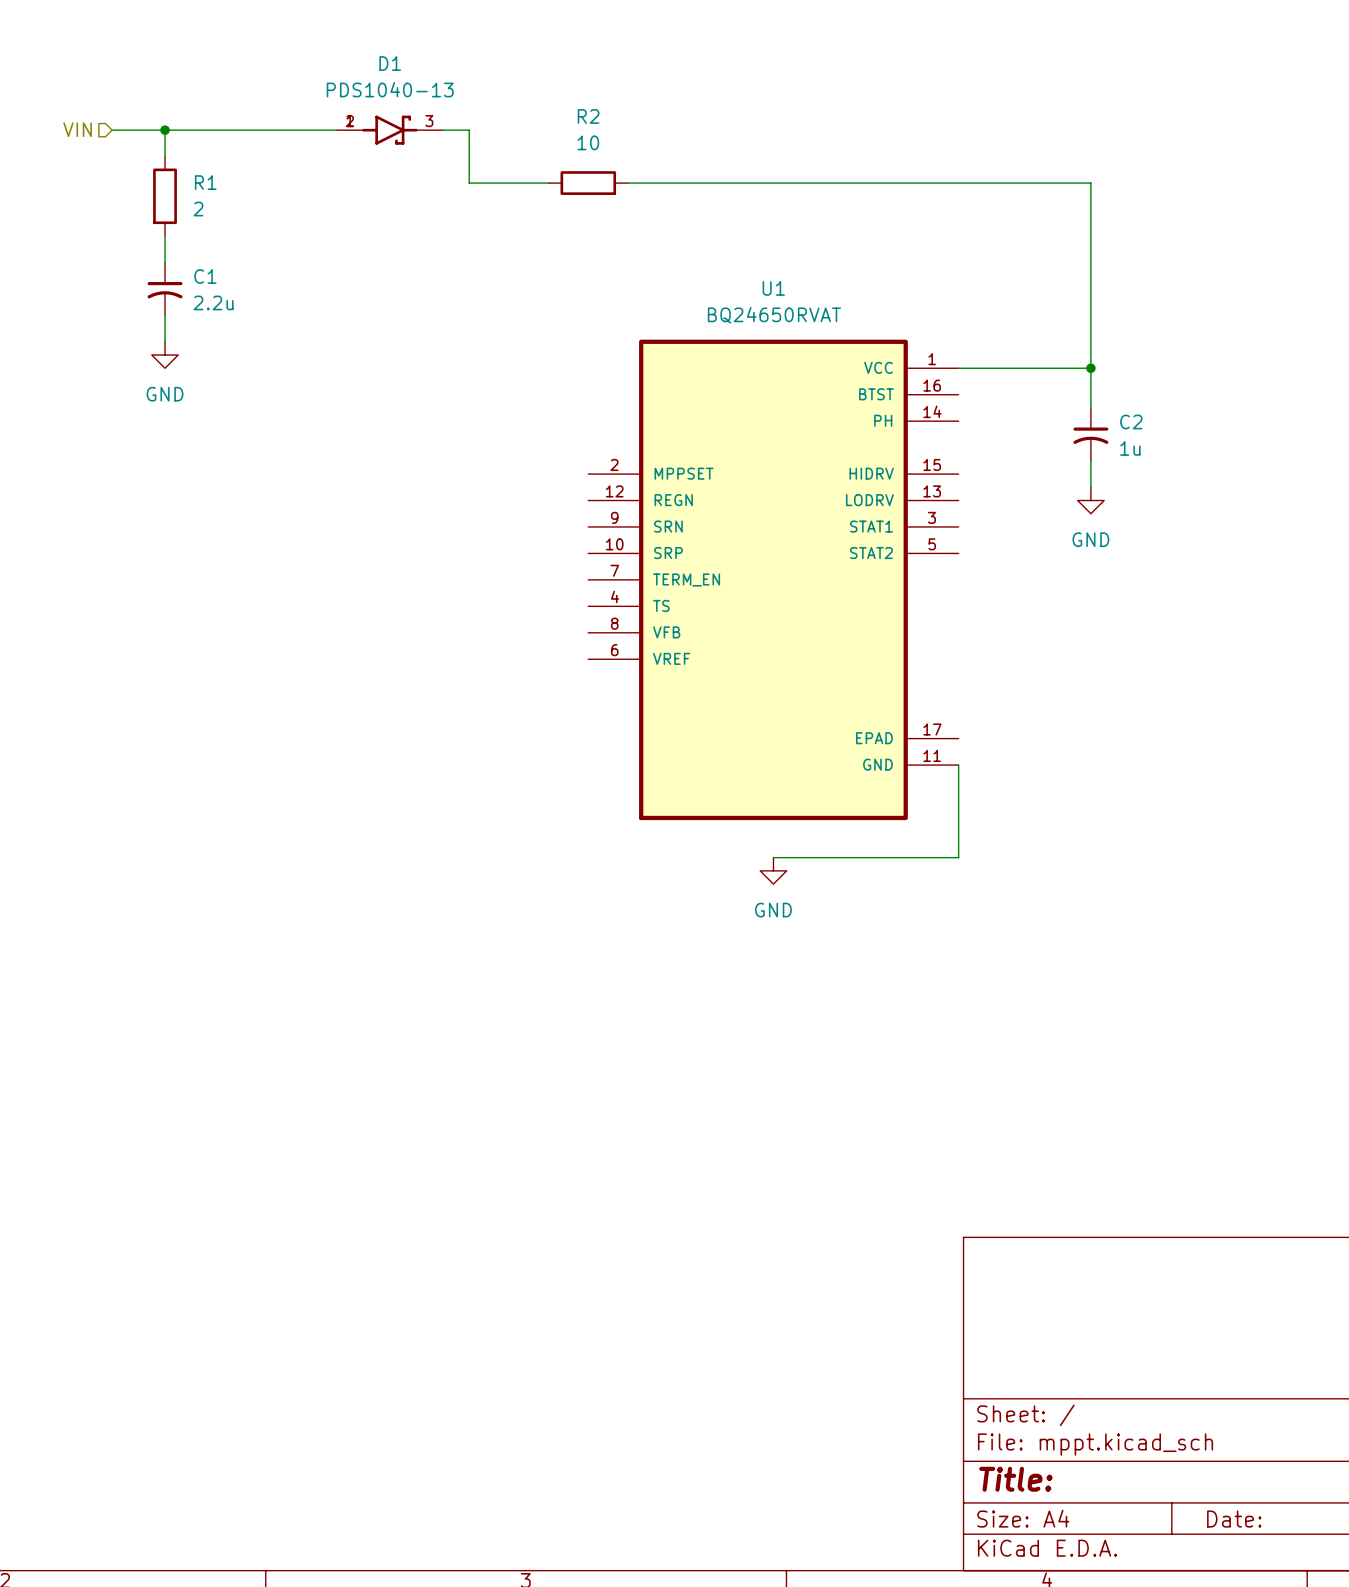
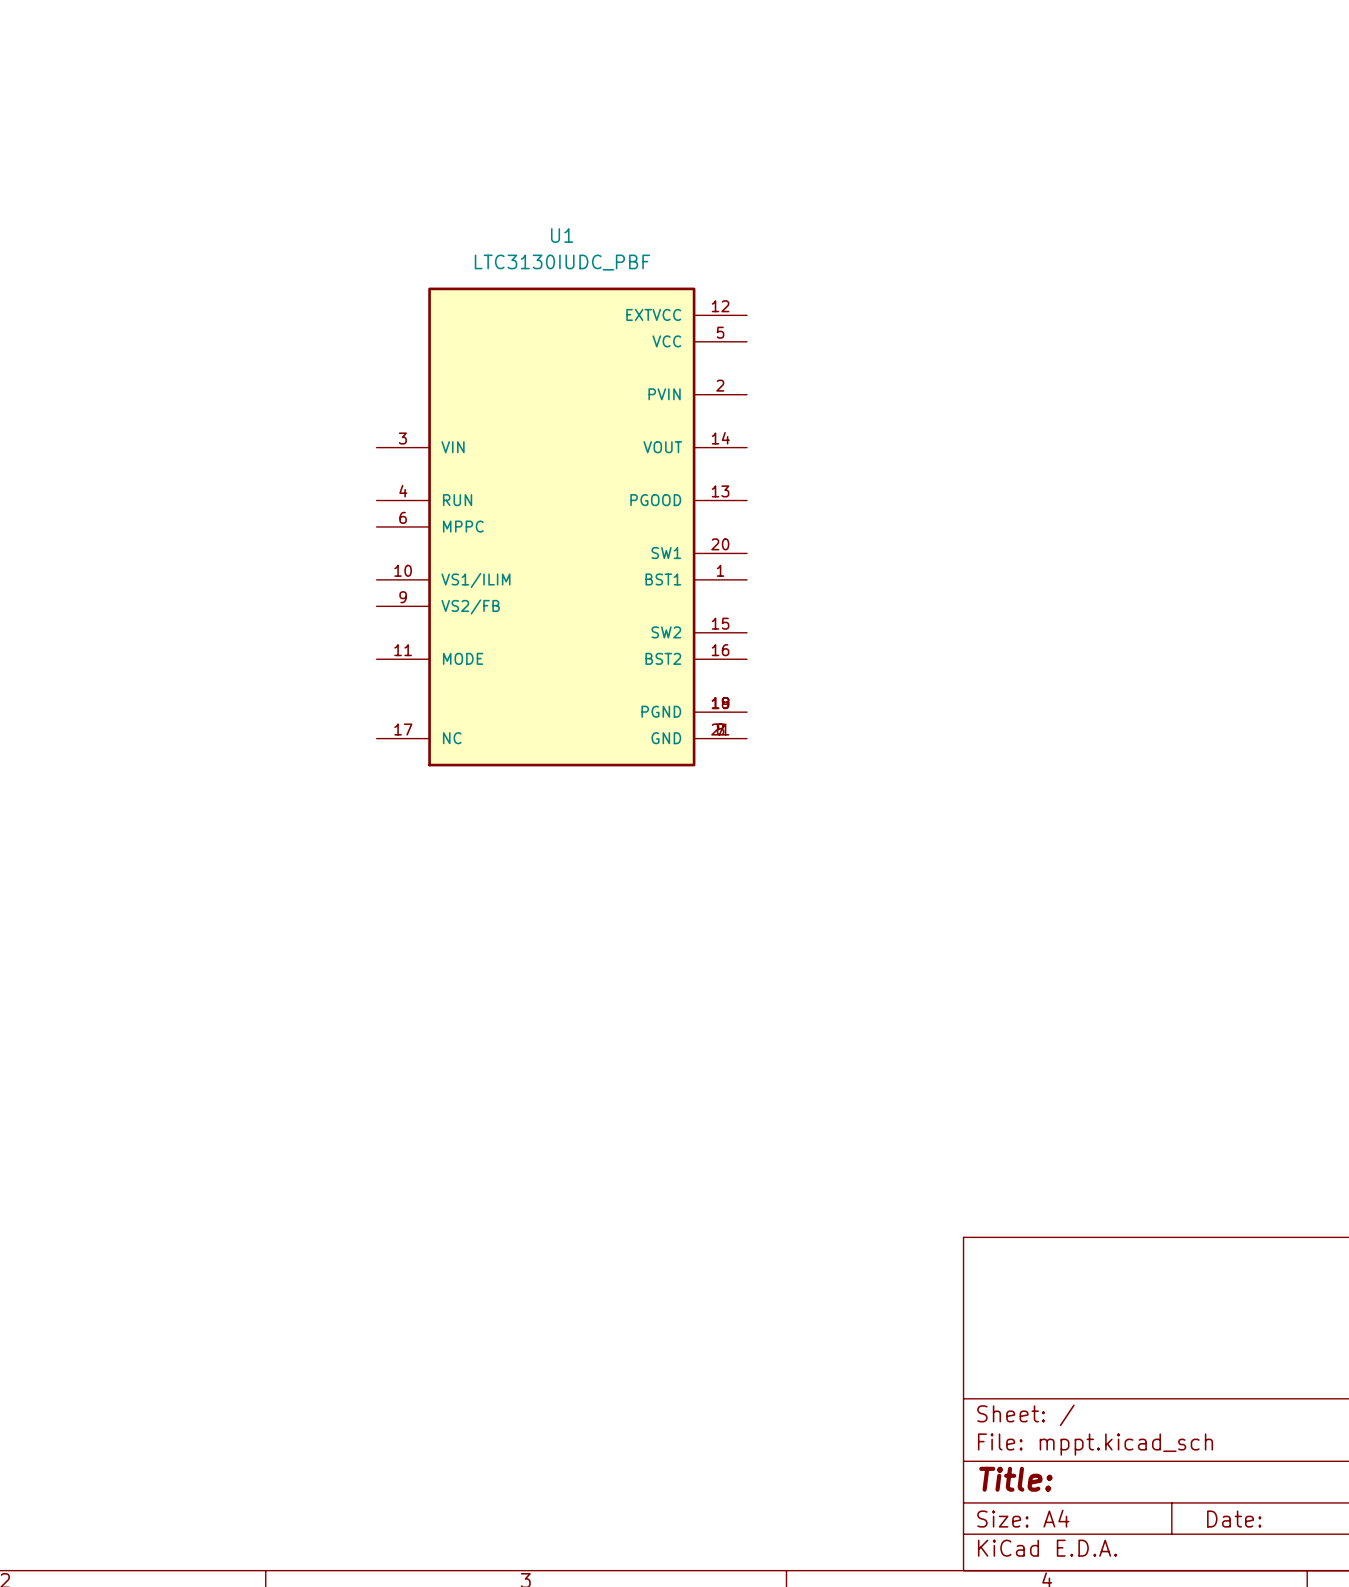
hierarchical label: VIN (77, 129) -> none
wire: (112, 130) (336, 130) -> none
wire: (165, 130) (165, 156) -> none
junction: (165, 130) -> none
D1: PDS1040-13 (389, 130) -> none
wire: (442, 130) (469, 130) (469, 183) (548, 183) -> none
R2: 10 (588, 183) -> none
wire: (627, 183) (1090, 183) (1090, 407) -> none
R1: 2 (165, 196) -> none
wire: (165, 235) (165, 262) -> none
C1: 2.2u (165, 288) -> none
wire: (165, 315) (165, 341) -> none
U1 value: BQ24650RVAT (774, 315) -> LTC3130IUDC_PBF (562, 262)
U1 symbol: [588, 339, 959, 821] -> [376, 287, 748, 767]
power symbol: GND (165, 355) -> none
wire: (958, 368) (1090, 368) -> none
junction: (1090, 368) -> none
C2: 1u (1090, 434) -> none
wire: (1090, 460) (1090, 487) -> none
power symbol: GND (1090, 500) -> none
wire: (958, 765) (958, 857) (773, 857) -> none
power symbol: GND (773, 870) -> none

